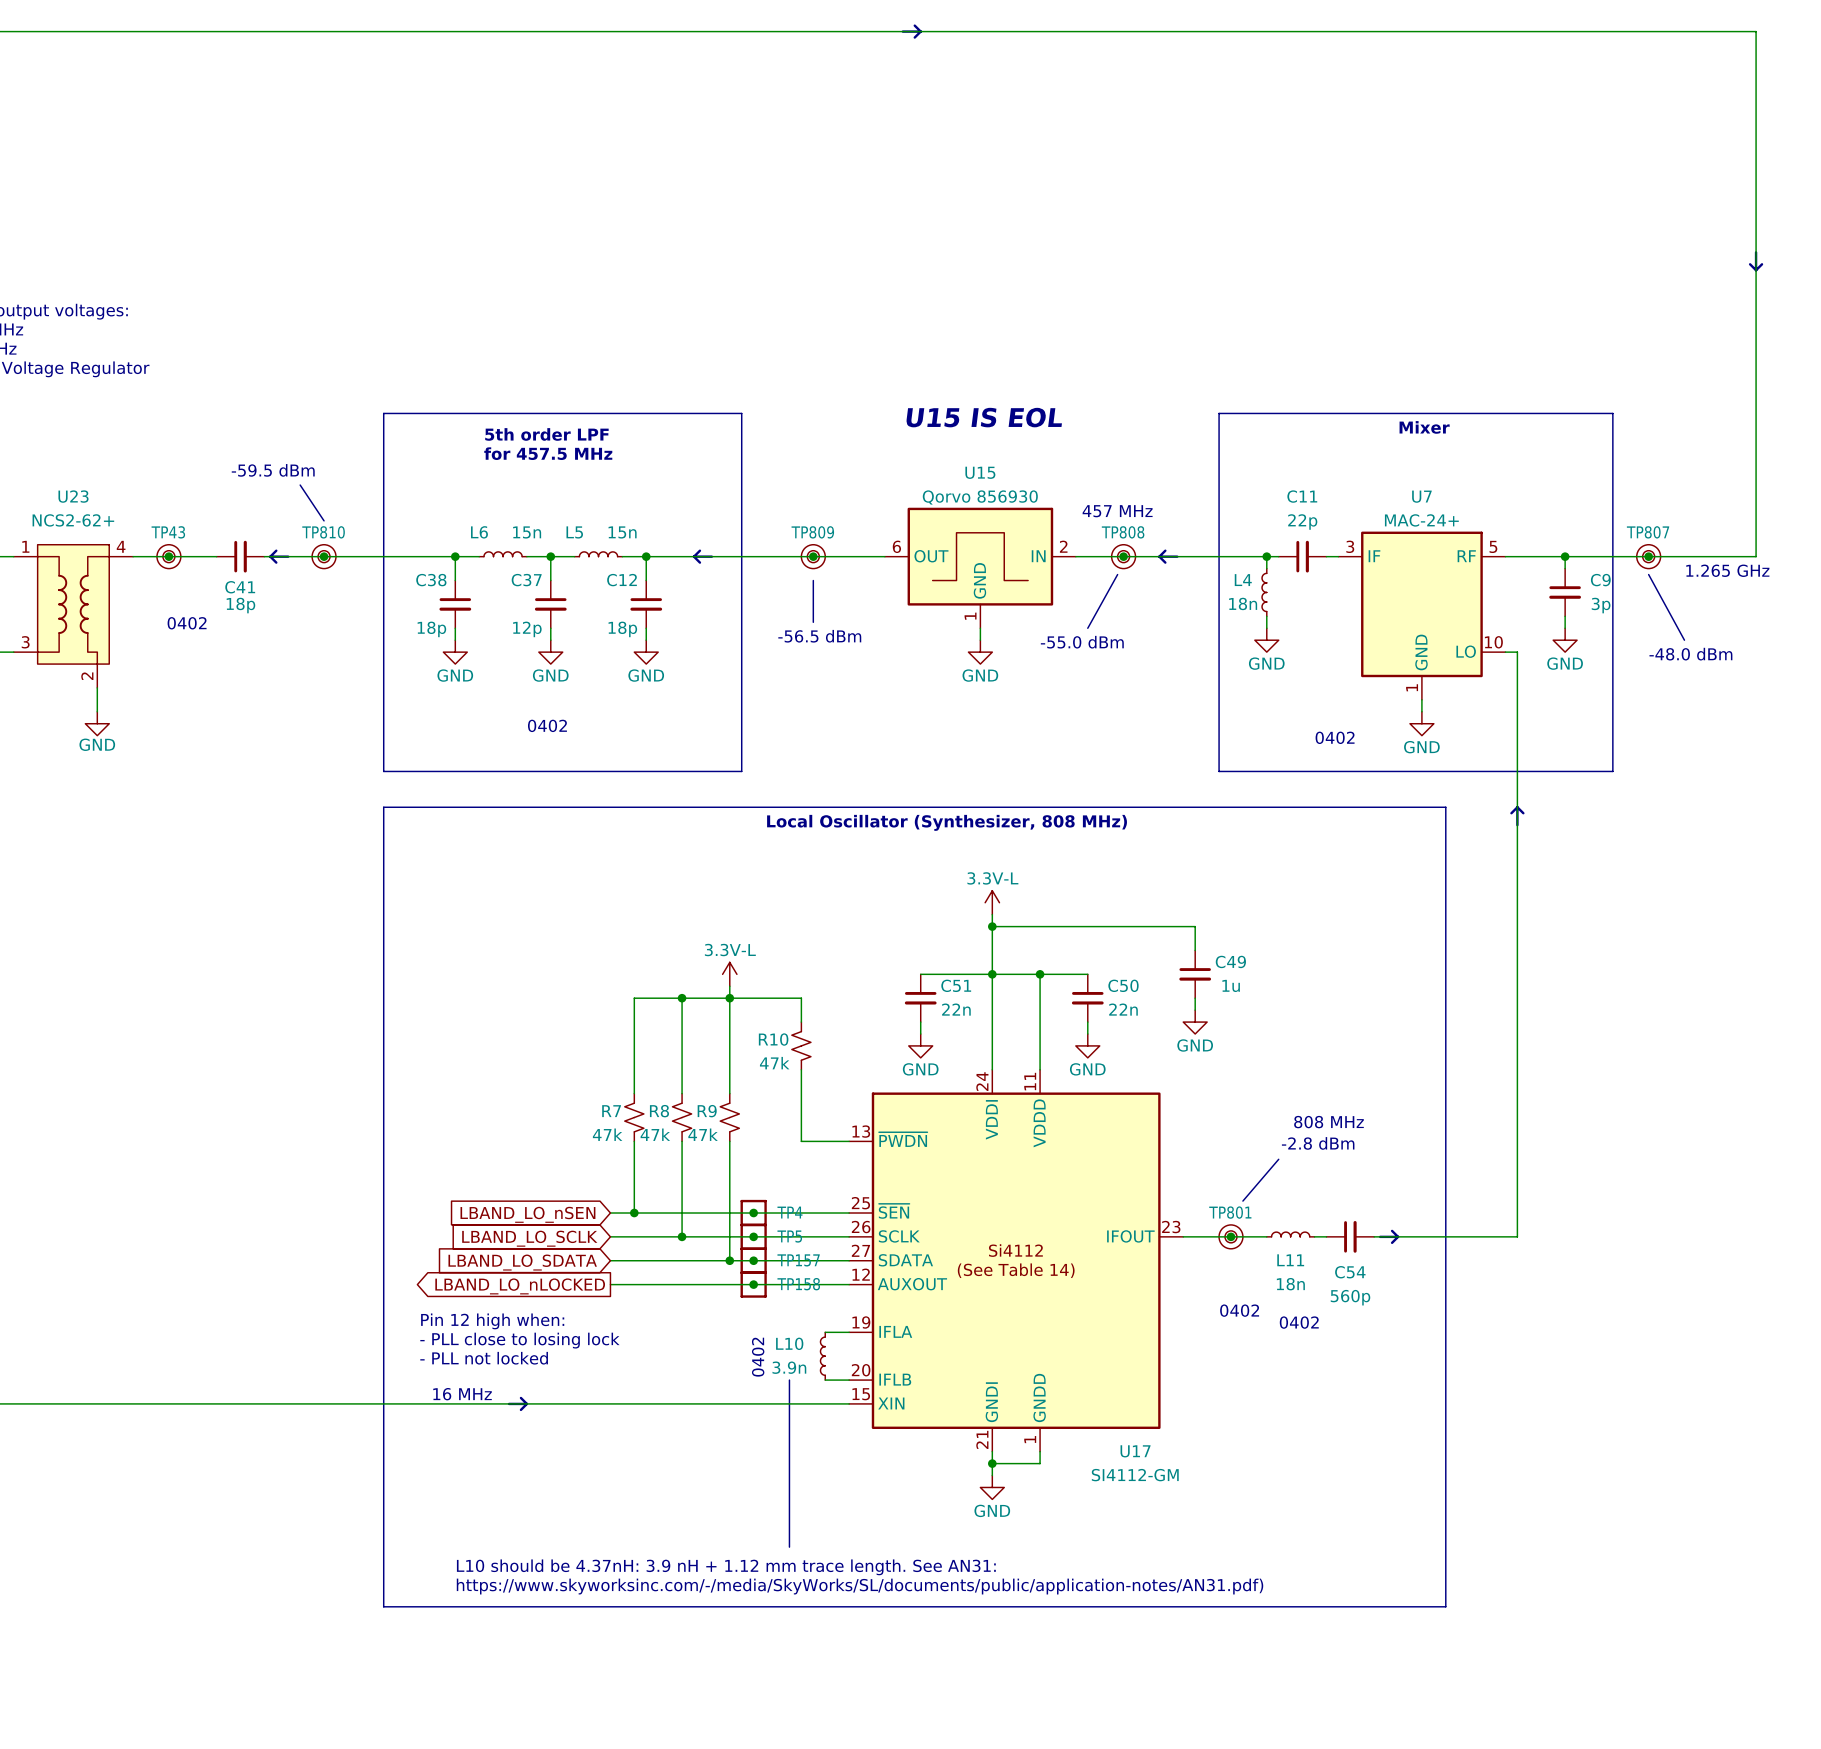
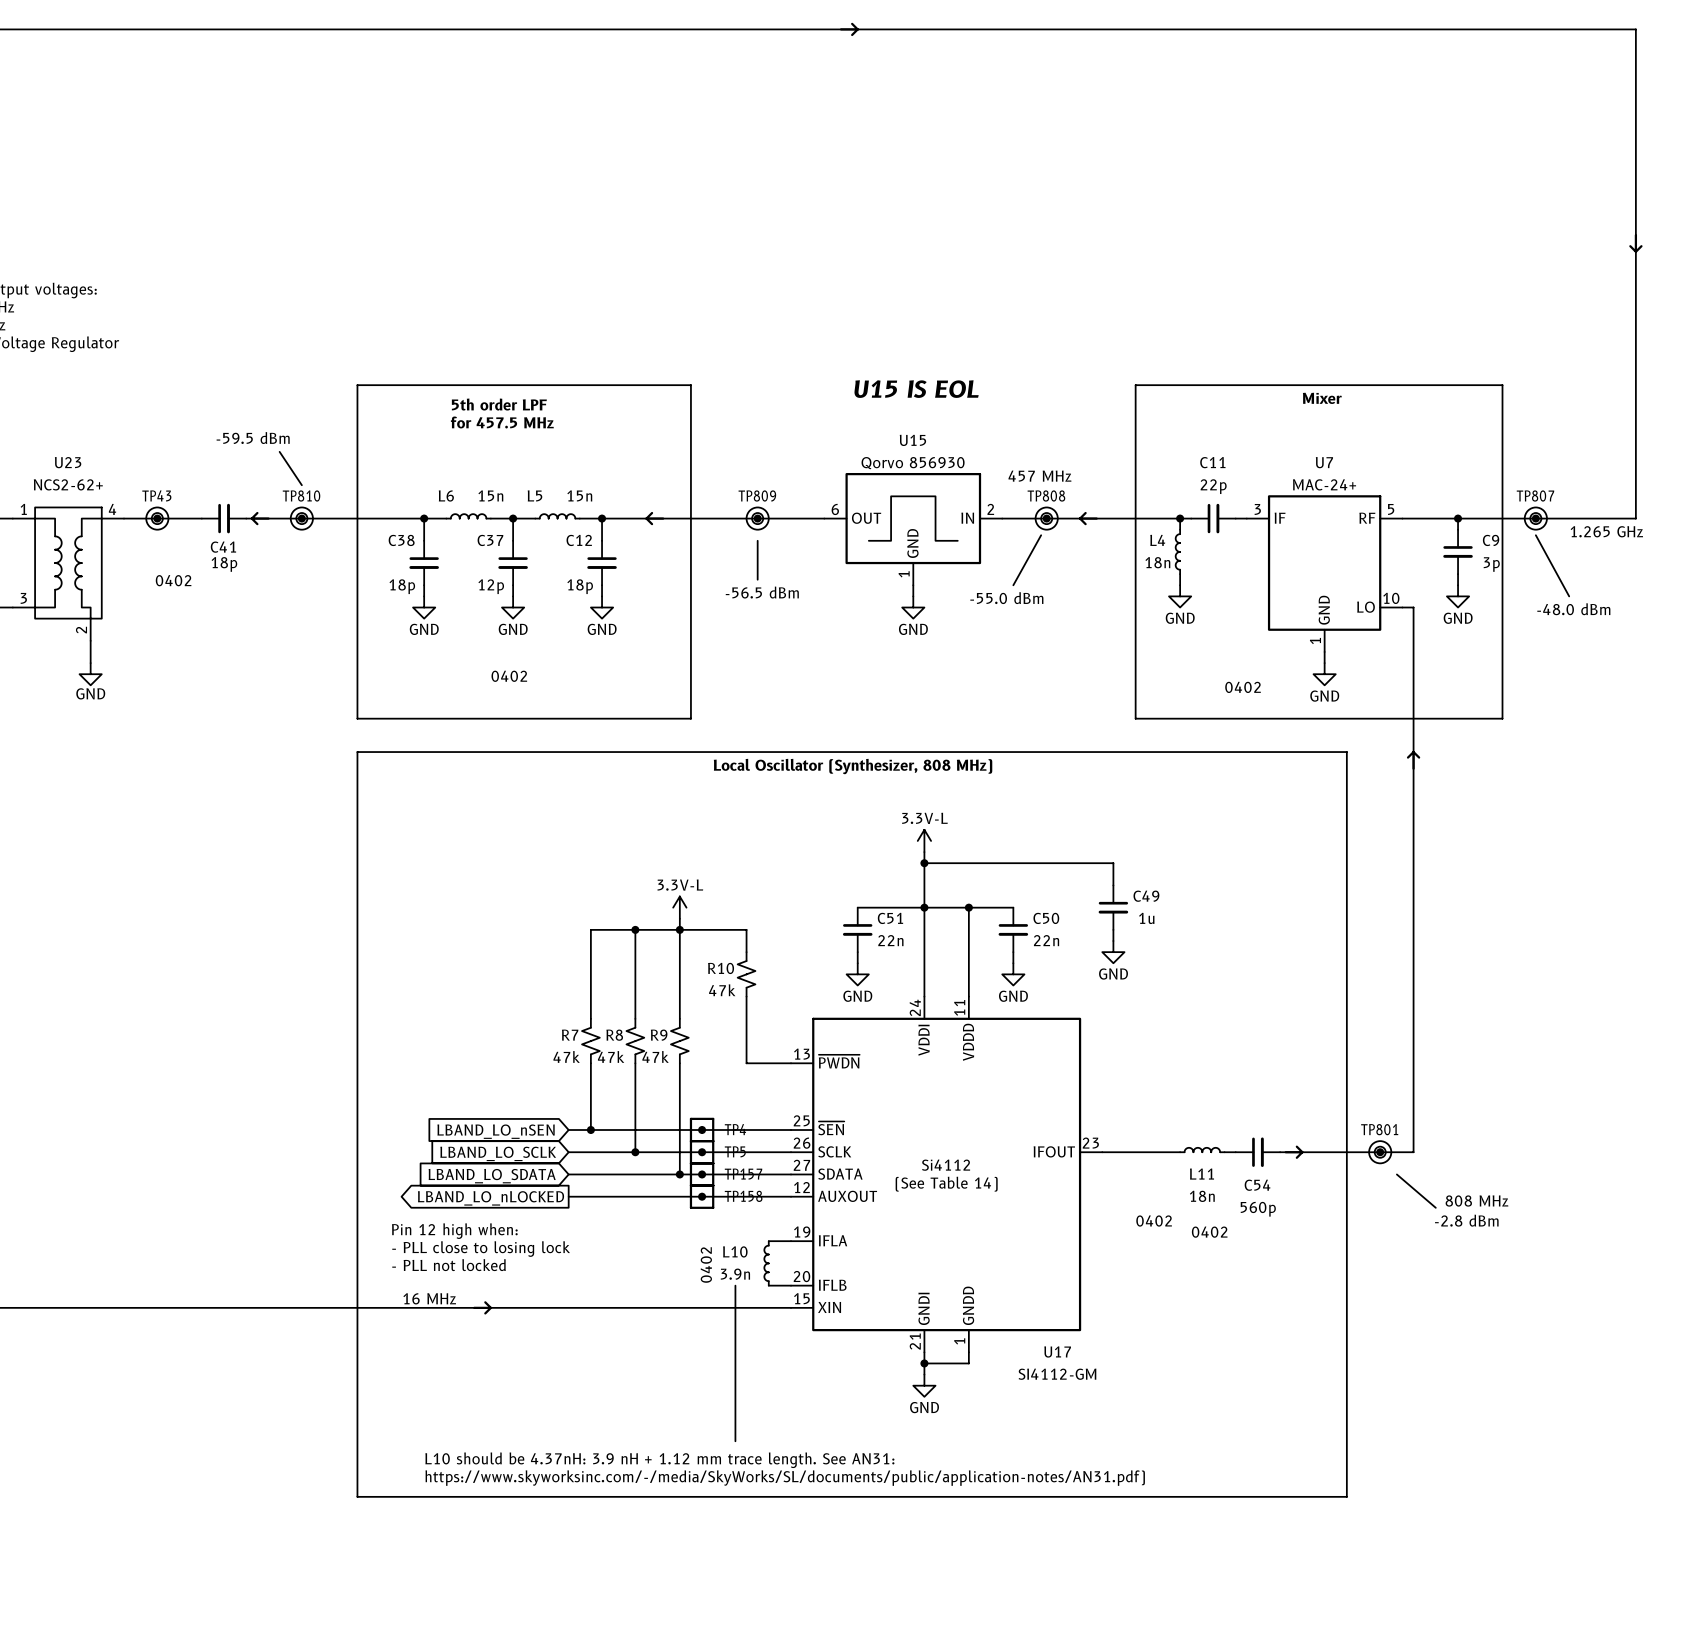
text: 808 MHz (1328, 1122) -> none
text: -2.8 dBm (1318, 1143) -> none
line: (1278, 1159) (1242, 1201) -> none
junction: (1230, 1236) -> none
TP801 position: (1230, 1236) -> (1380, 1152)
junction: none -> (1380, 1152)
line: none -> (1396, 1174) (1435, 1207)
text: none -> 808 MHz (1476, 1201)
text: none -> -2.8 dBm (1466, 1220)

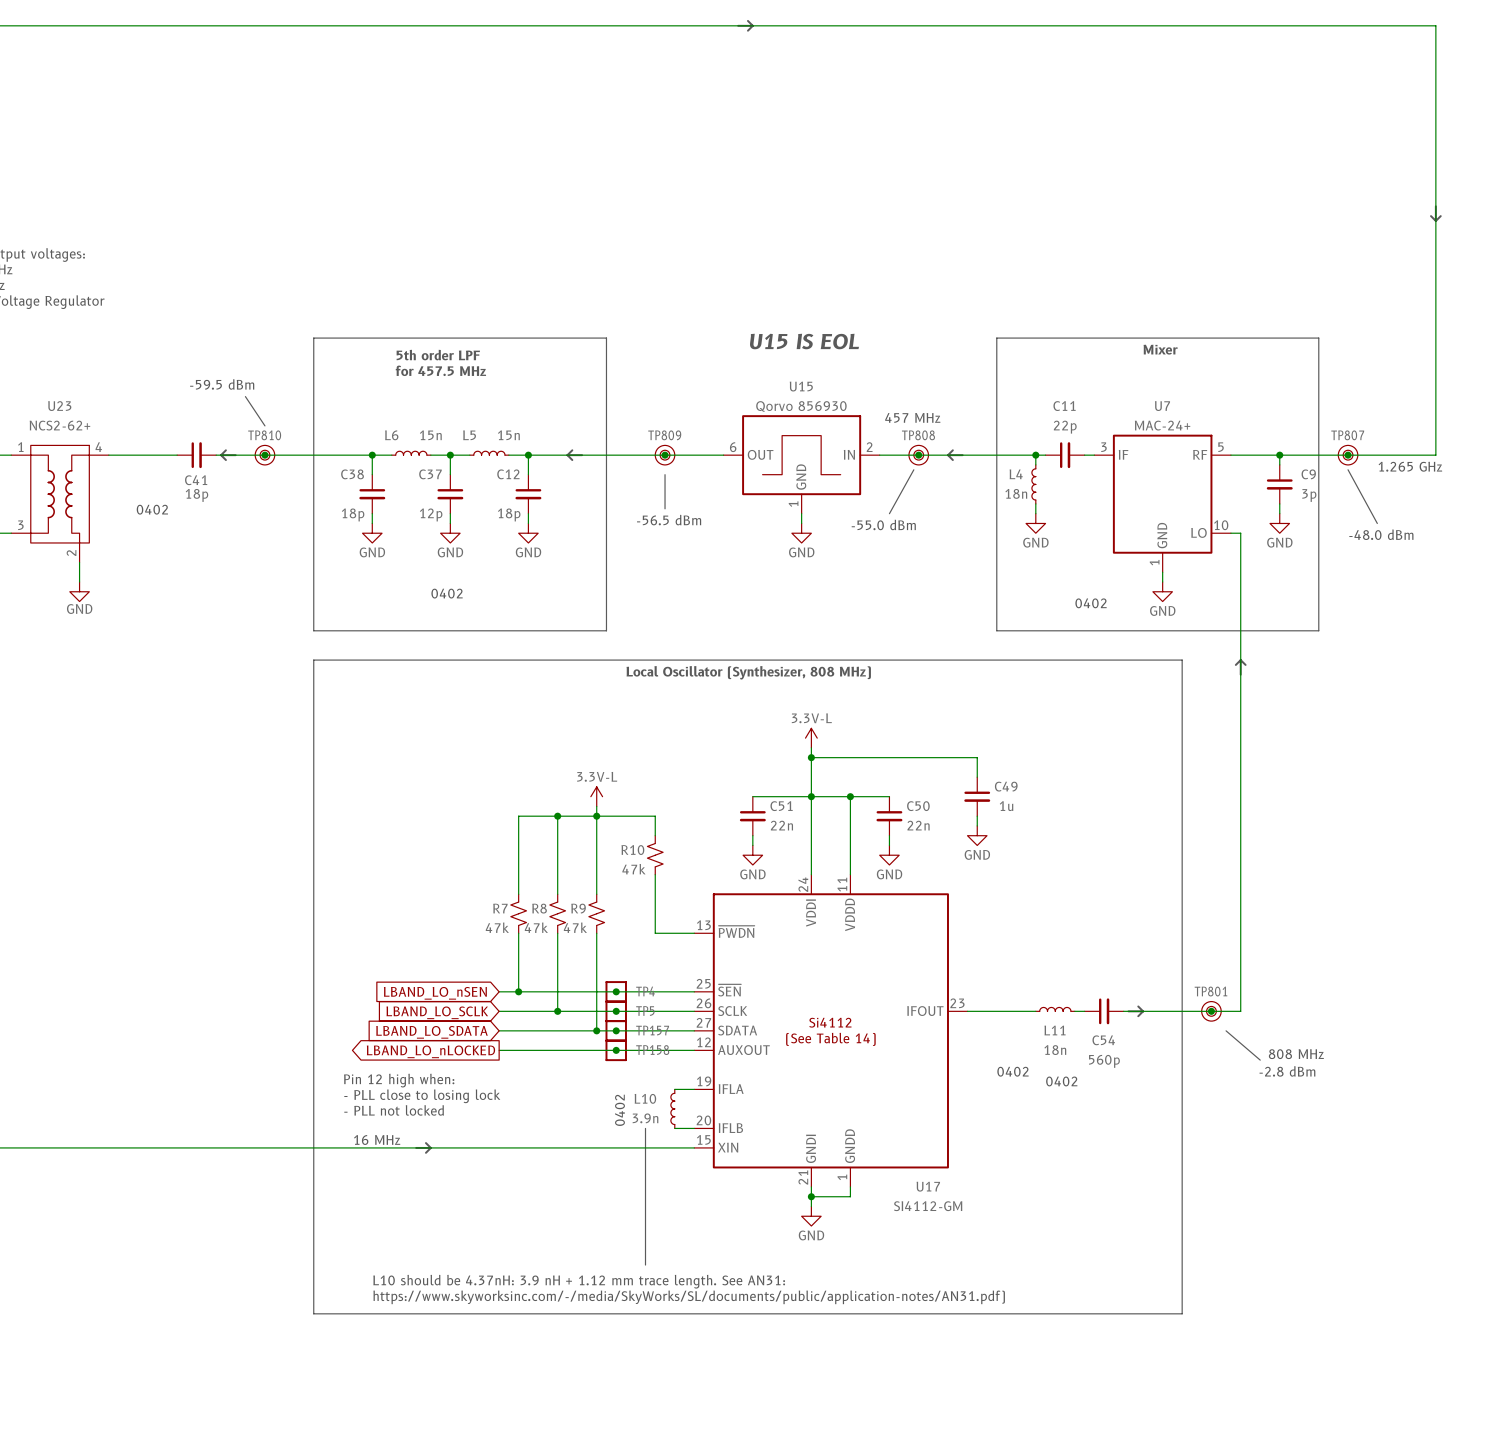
junction: (157, 518) -> none
TP43: (157, 518) -> none

